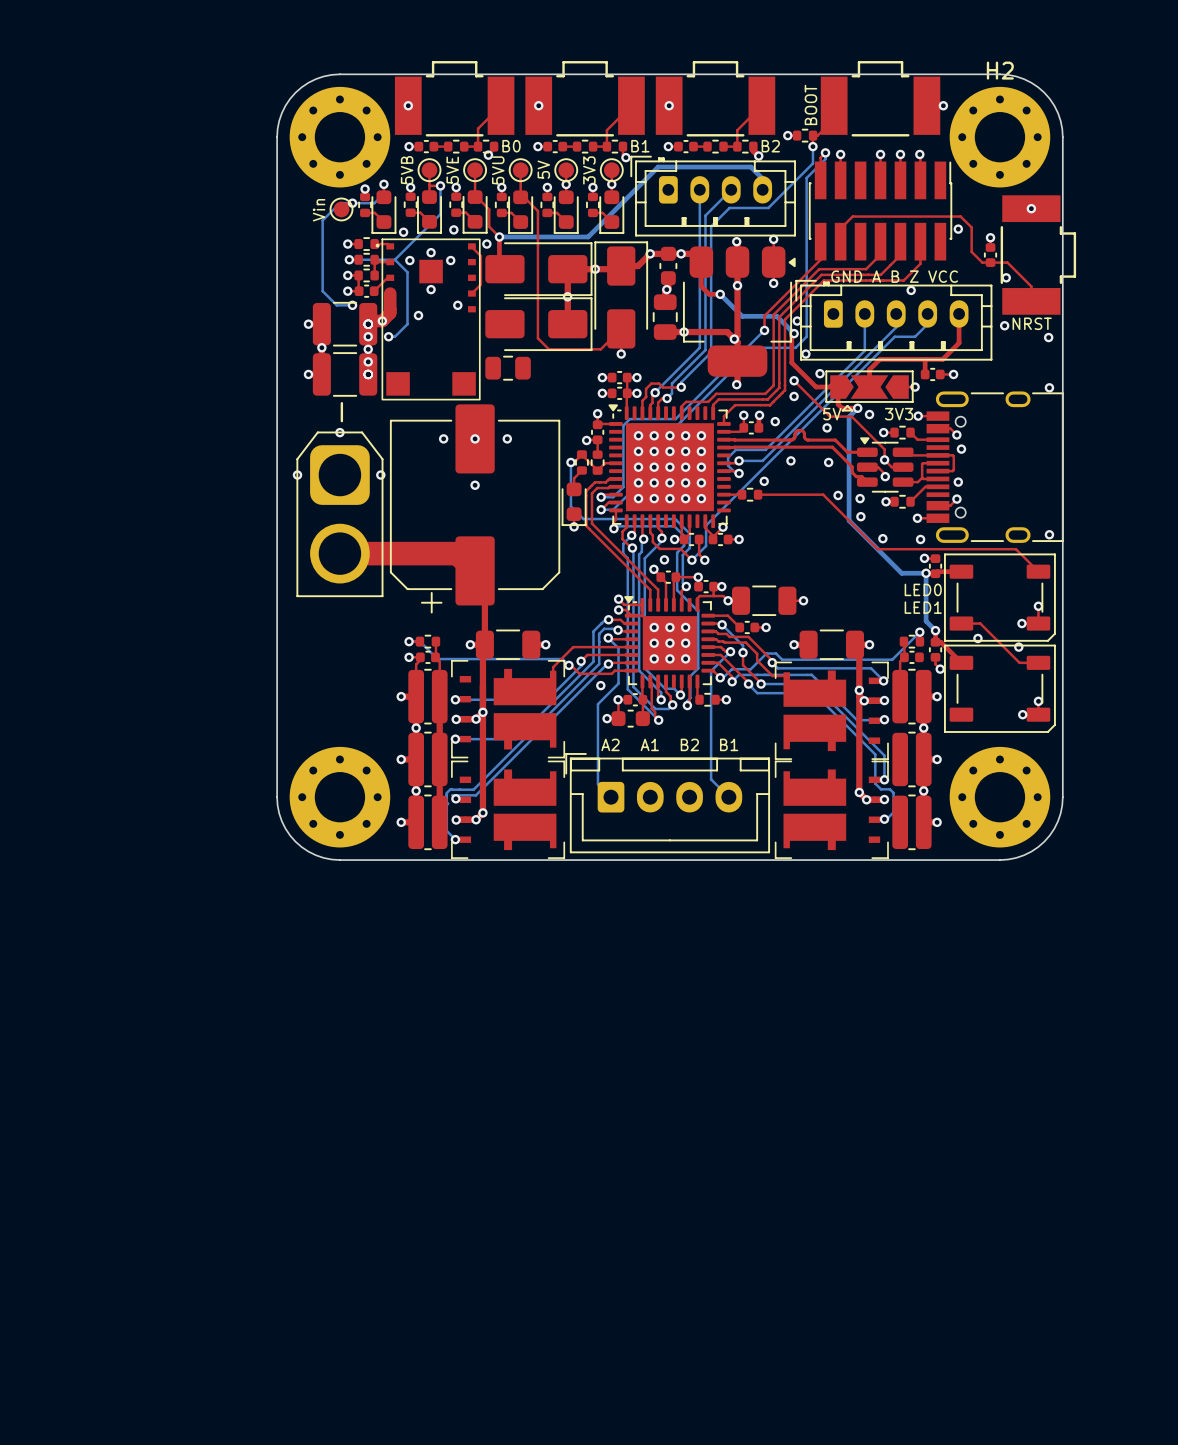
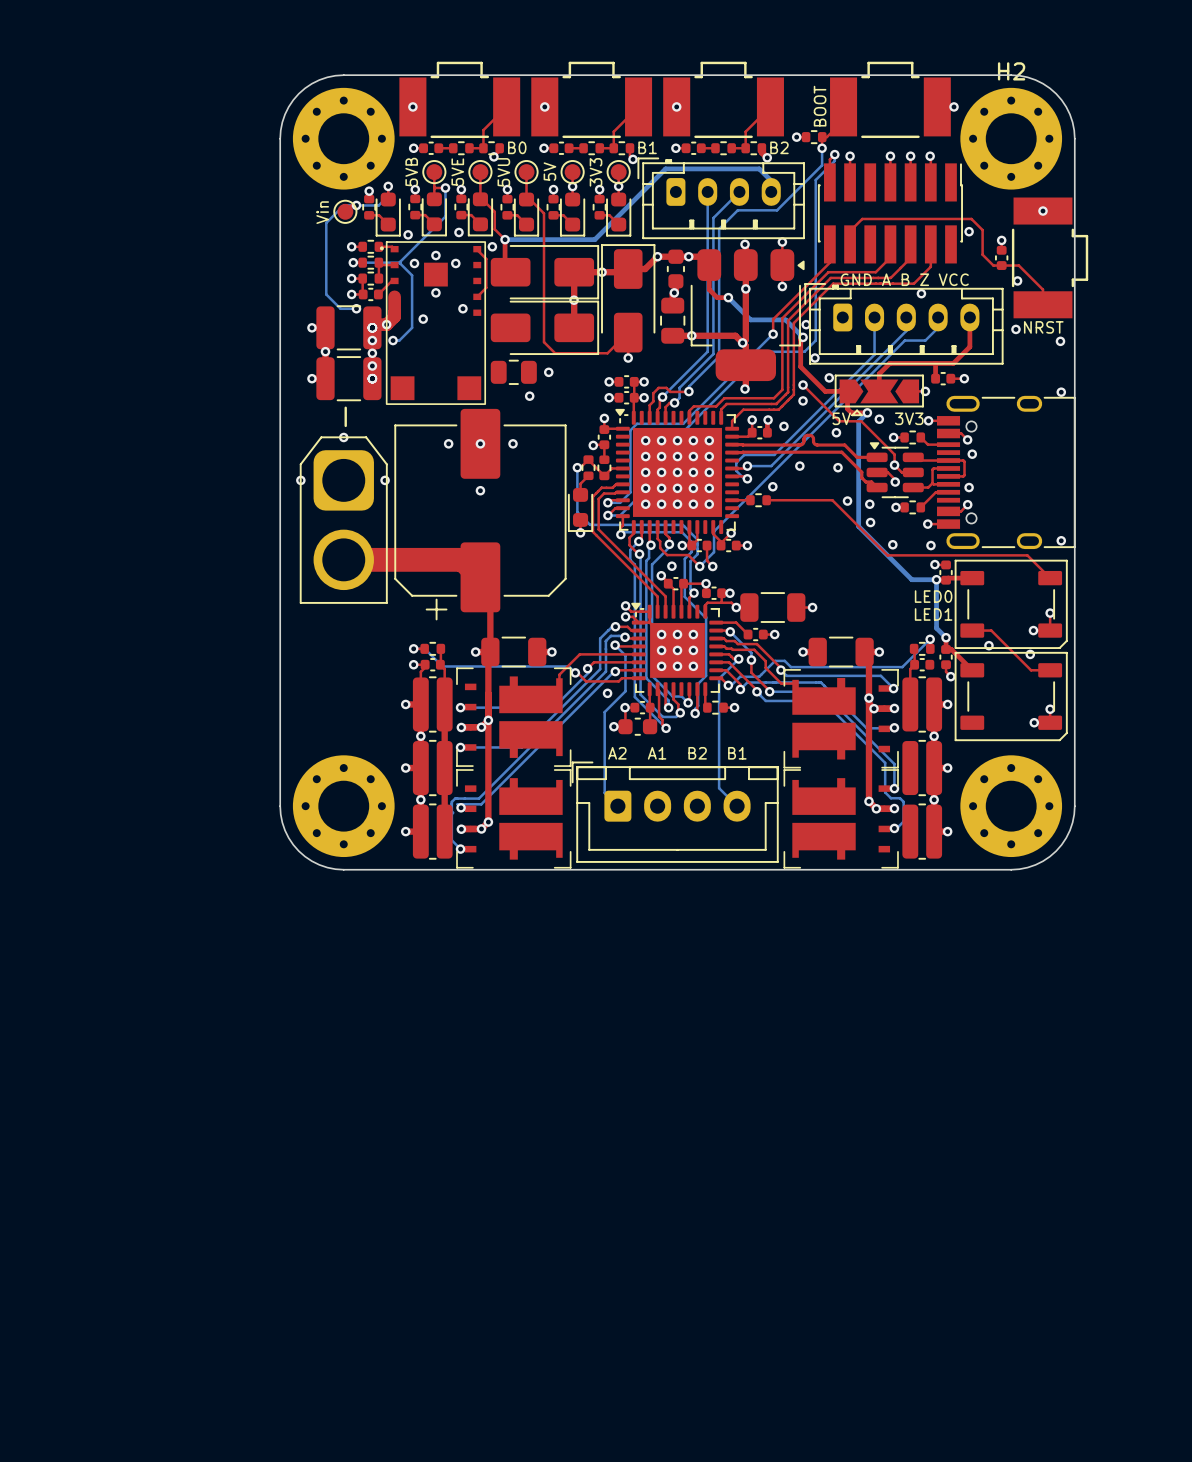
via: none -> (548, 372)
via: none -> (529, 396)

